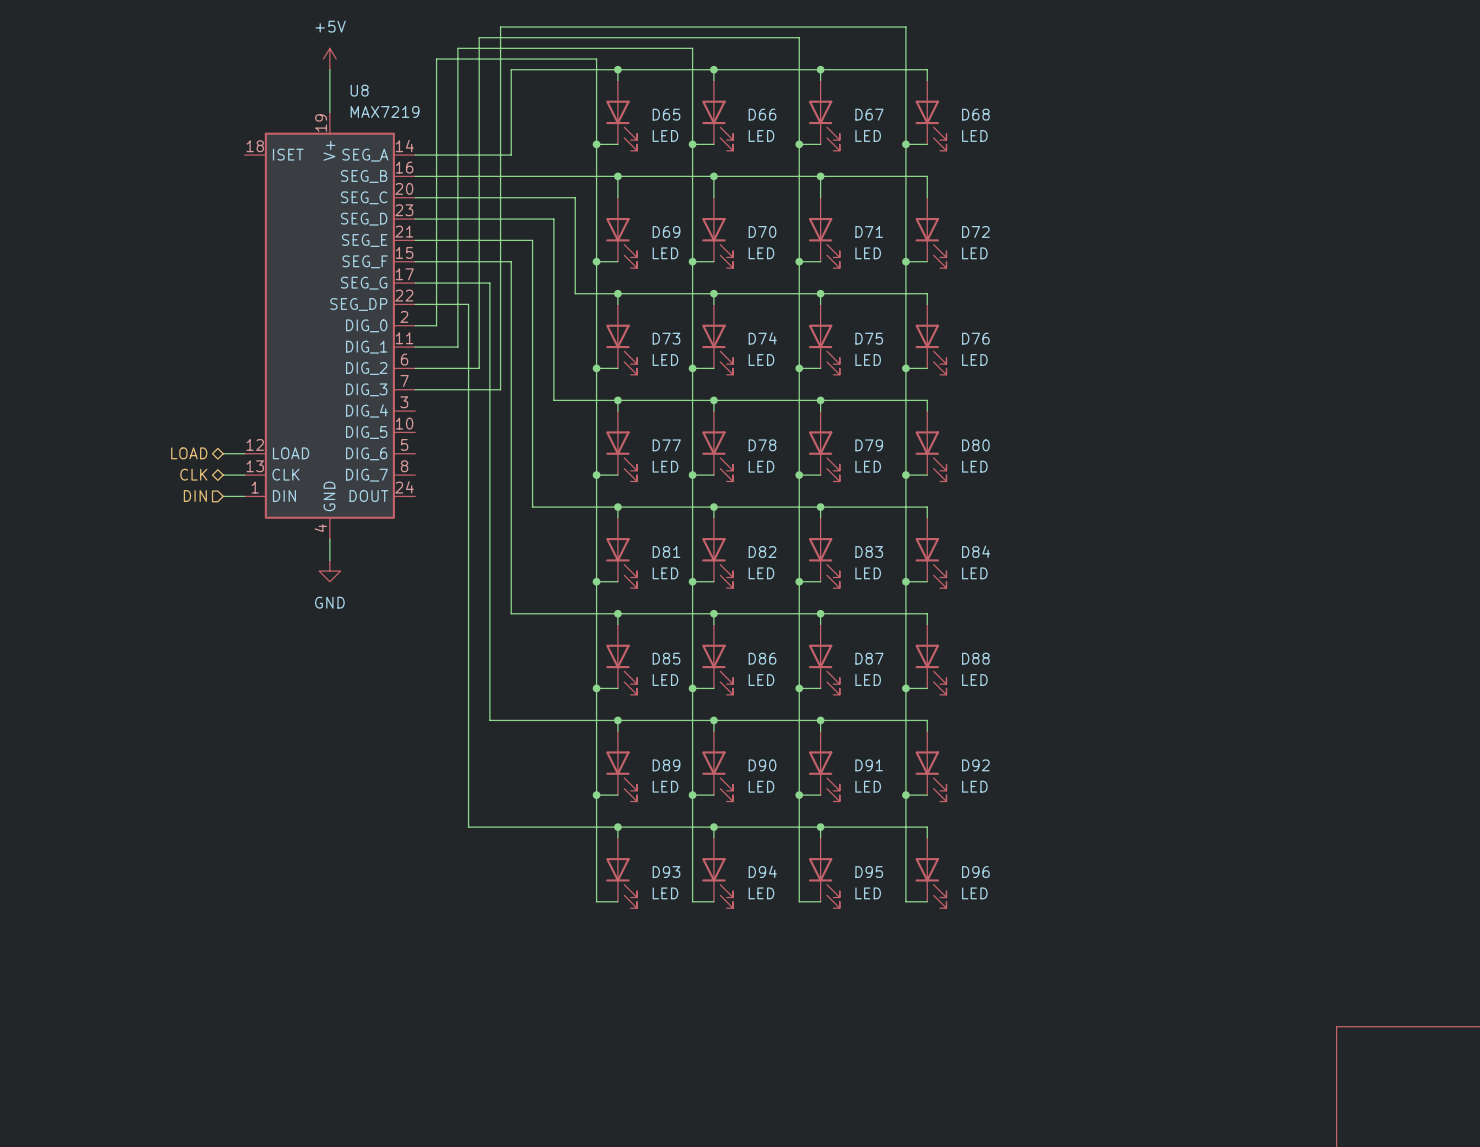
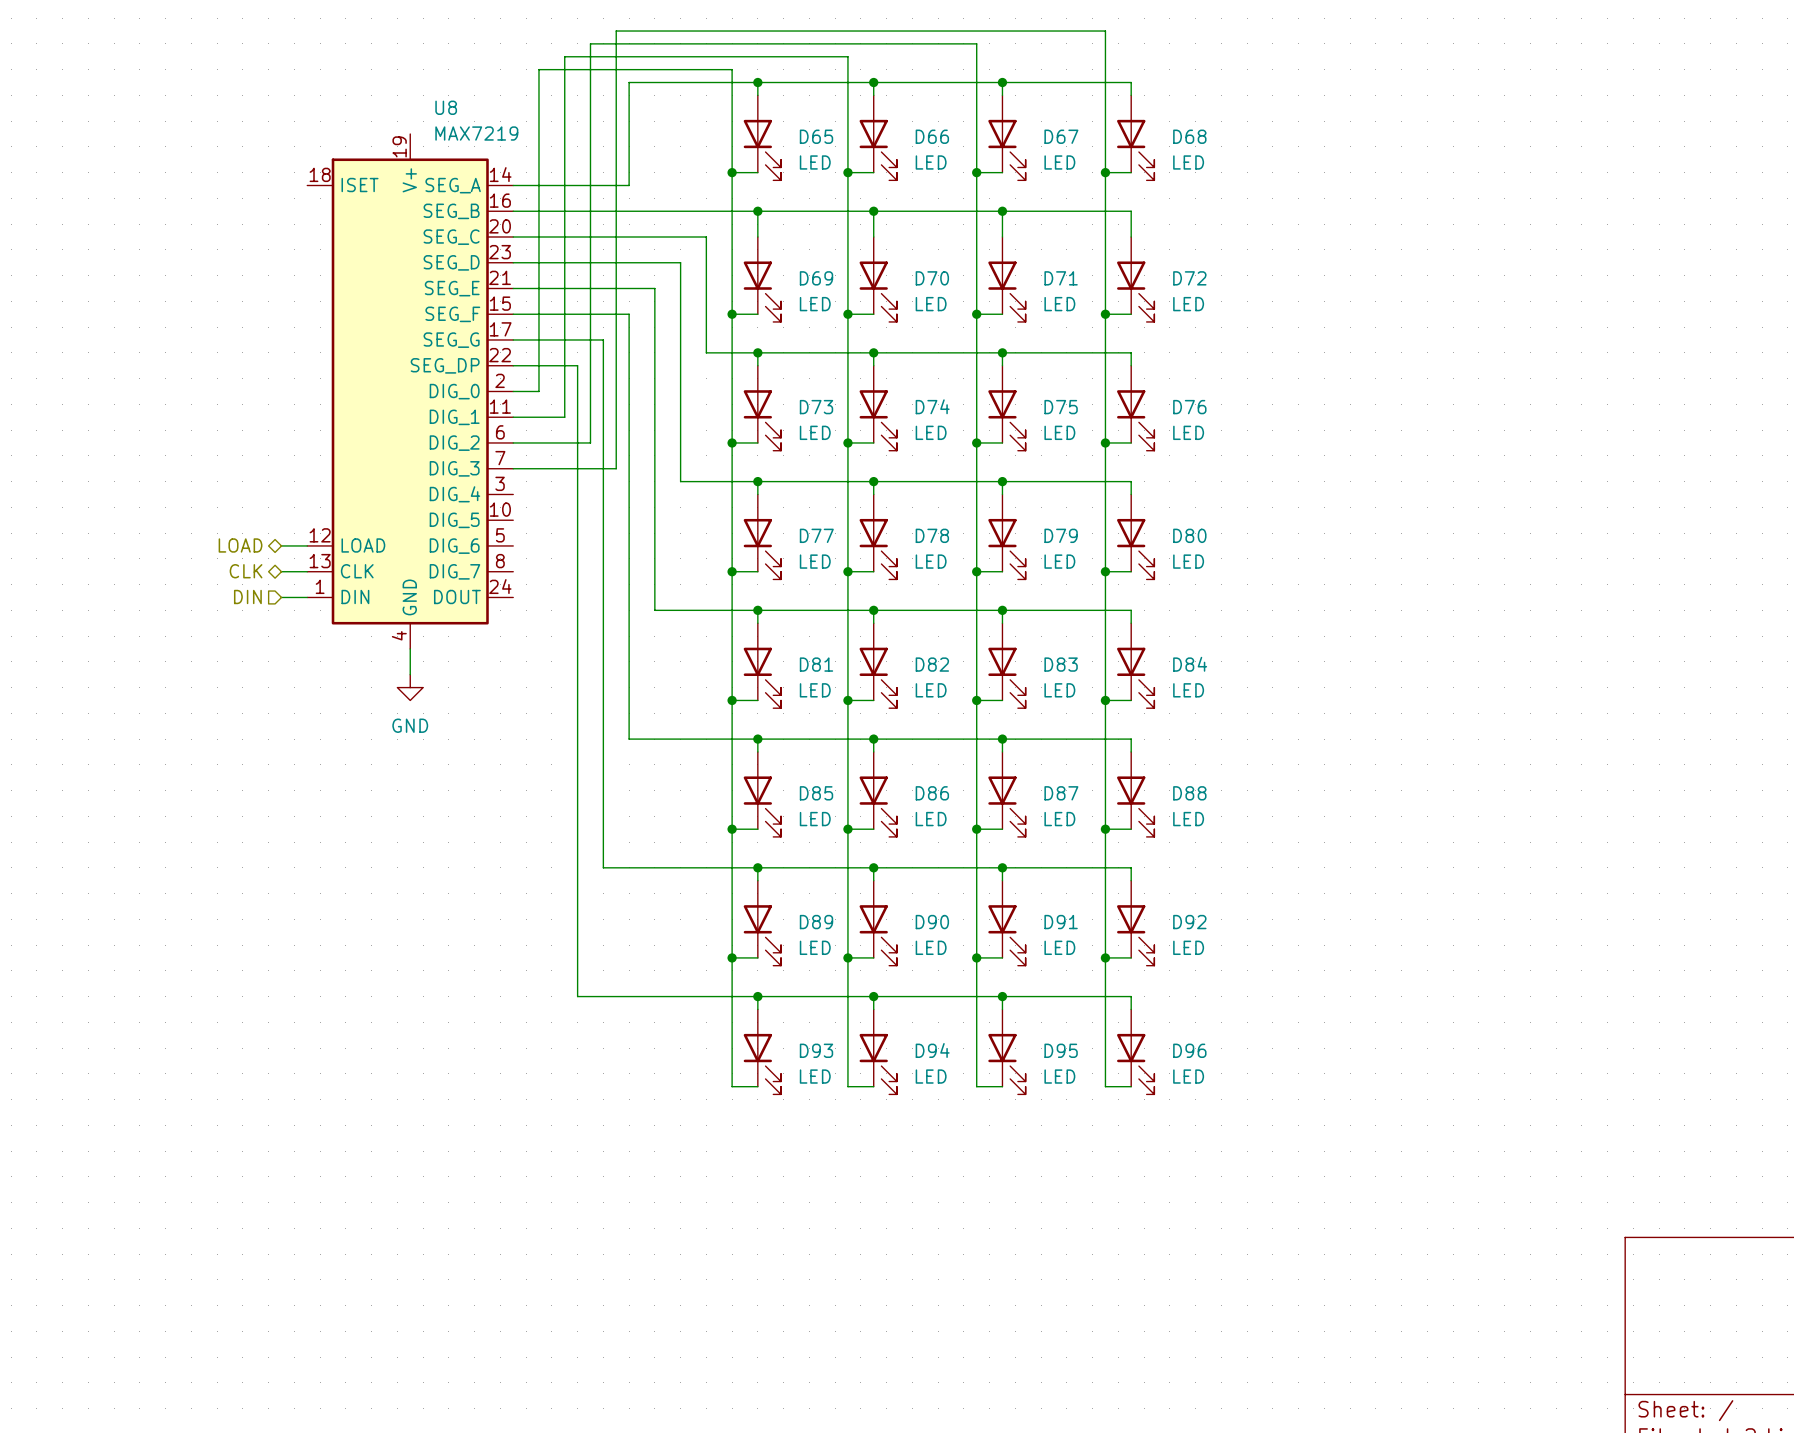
power symbol: +5V (329, 59) -> none
wire: (329, 69) (329, 112) -> none

